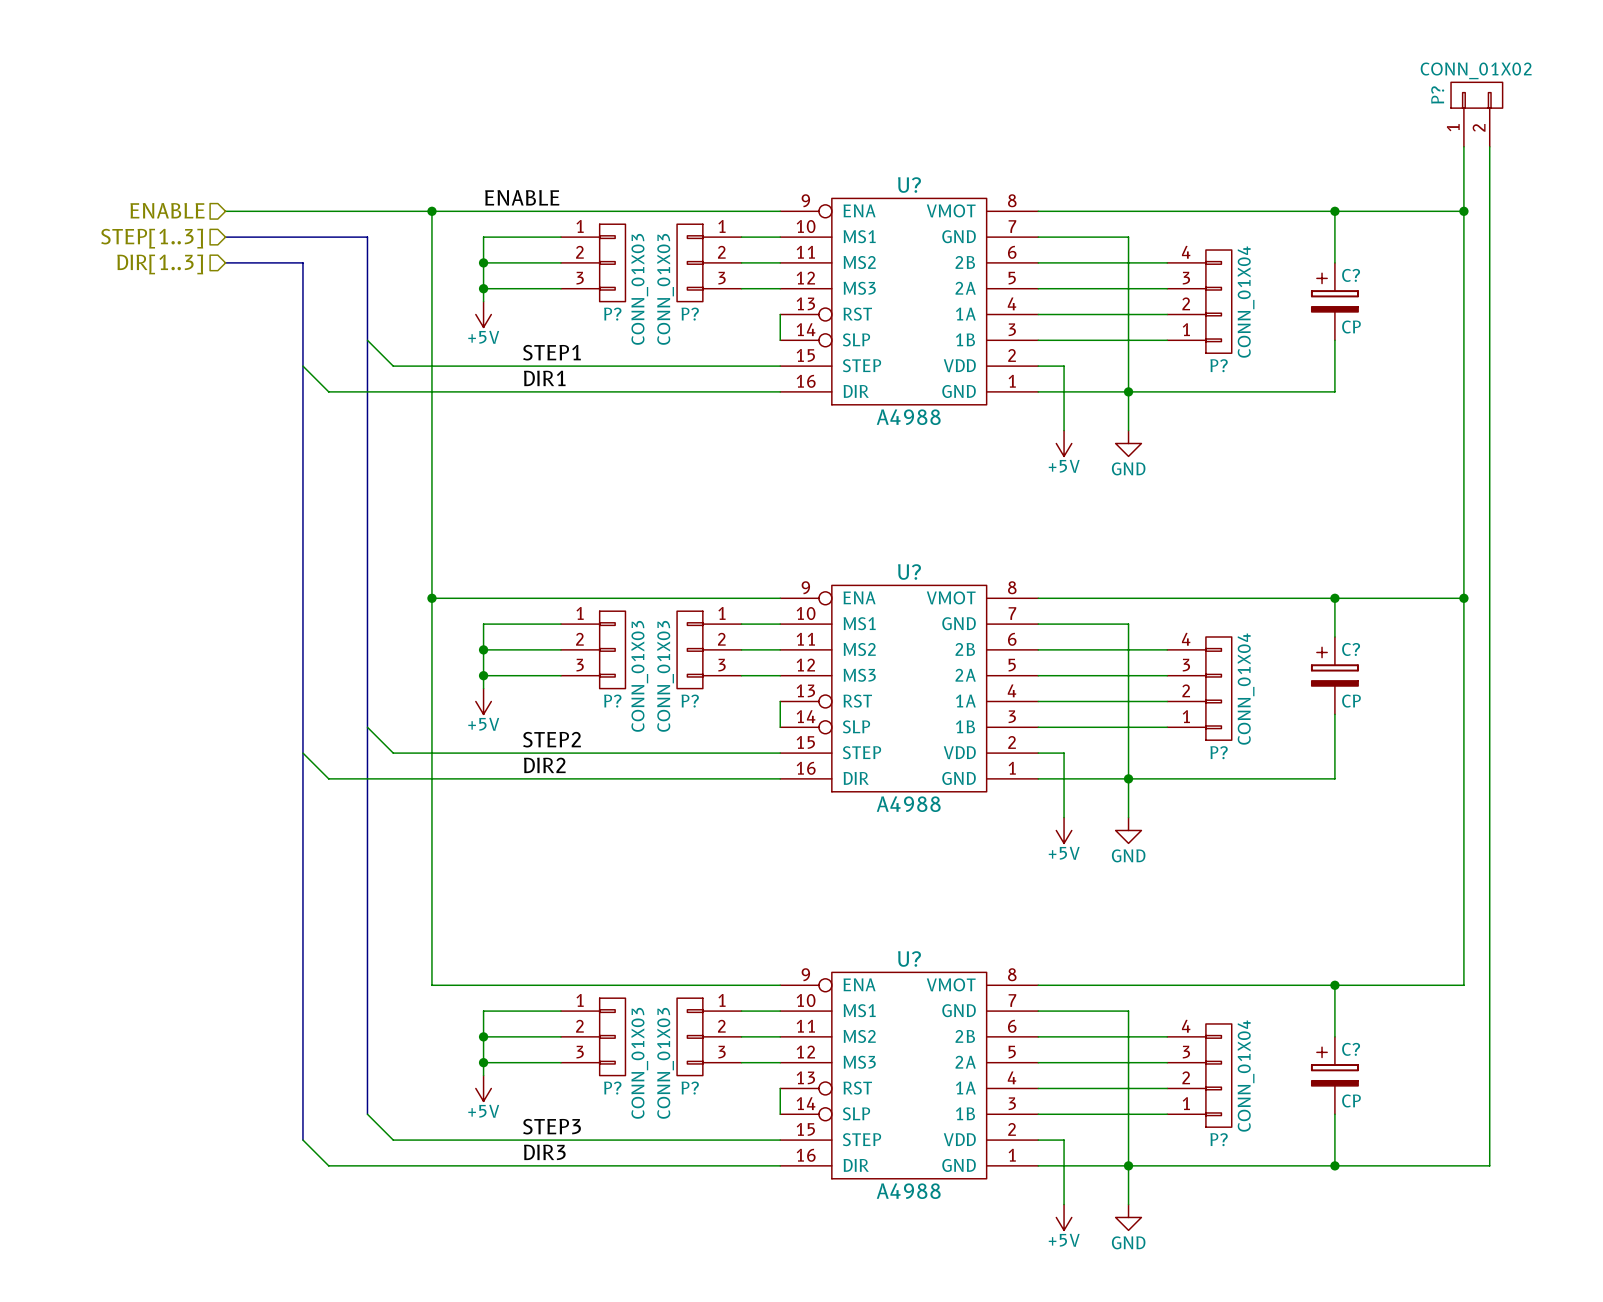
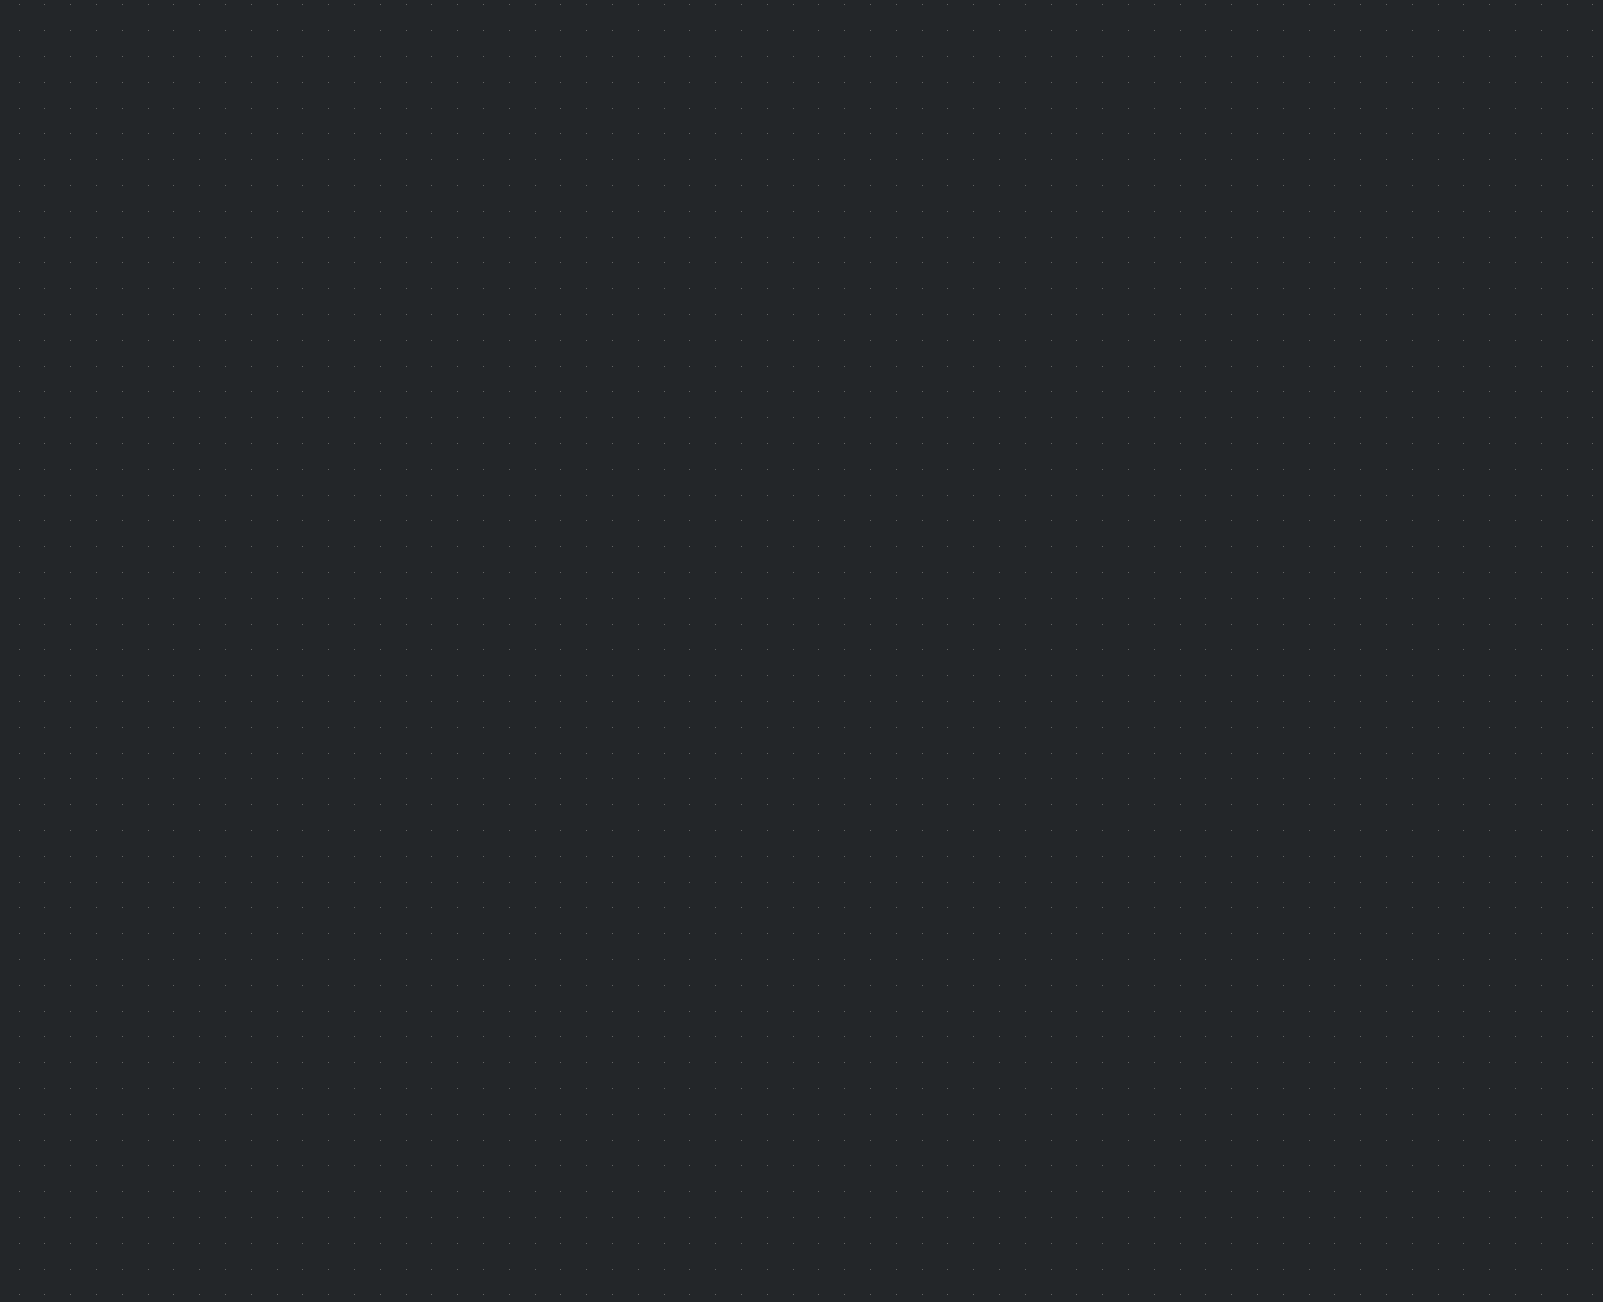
P?: CONN_01X02 (1476, 114) -> none
wire: (1463, 146) (1463, 985) (1038, 985) -> none
wire: (1489, 146) (1489, 1165) (1038, 1165) -> none
label: ENABLE (522, 197) -> none
hierarchical label: ENABLE (167, 210) -> none
wire: (225, 211) (780, 211) -> none
wire: (431, 211) (431, 985) (780, 985) -> none
junction: (431, 211) -> none
wire: (1038, 211) (1463, 211) -> none
wire: (1334, 211) (1334, 262) -> none
junction: (1334, 211) -> none
junction: (1463, 211) -> none
bus: (225, 237) (367, 237) (367, 1114) -> none
wire: (560, 237) (483, 237) (483, 301) -> none
wire: (741, 237) (780, 237) -> none
wire: (1038, 237) (1128, 237) (1128, 430) -> none
hierarchical label: STEP[1..3] (152, 238) -> none
bus: (225, 262) (302, 262) (302, 1140) -> none
wire: (483, 262) (560, 262) -> none
junction: (483, 262) -> none
P?: CONN_01X03 (593, 262) -> none
P?: CONN_01X03 (709, 262) -> none
wire: (741, 262) (780, 262) -> none
wire: (1038, 262) (1167, 262) -> none
hierarchical label: DIR[1..3] (160, 264) -> none
wire: (483, 288) (560, 288) -> none
junction: (483, 288) -> none
wire: (741, 288) (780, 288) -> none
wire: (1038, 288) (1167, 288) -> none
P?: CONN_01X04 (1199, 301) -> none
C?: CP (1334, 301) -> none
power symbol: +5V (483, 314) -> none
wire: (780, 314) (780, 340) -> none
wire: (1038, 314) (1167, 314) -> none
wire: (367, 340) (393, 366) (780, 366) -> none
U?: A4988 (915, 340) -> none
wire: (1038, 340) (1167, 340) -> none
wire: (1334, 340) (1334, 391) (1038, 391) -> none
label: STEP1 (551, 352) -> none
wire: (302, 366) (328, 391) (780, 391) -> none
wire: (1038, 366) (1064, 366) (1064, 430) -> none
label: DIR1 (544, 378) -> none
junction: (1128, 391) -> none
power symbol: +5V (1064, 443) -> none
power symbol: GND (1128, 443) -> none
wire: (431, 598) (780, 598) -> none
junction: (431, 598) -> none
wire: (1038, 598) (1463, 598) -> none
wire: (1334, 598) (1334, 636) -> none
junction: (1334, 598) -> none
junction: (1463, 598) -> none
wire: (560, 624) (483, 624) (483, 688) -> none
wire: (741, 624) (780, 624) -> none
wire: (1038, 624) (1128, 624) (1128, 817) -> none
wire: (483, 649) (560, 649) -> none
junction: (483, 649) -> none
P?: CONN_01X03 (593, 649) -> none
P?: CONN_01X03 (709, 649) -> none
wire: (741, 649) (780, 649) -> none
wire: (1038, 649) (1167, 649) -> none
wire: (483, 675) (560, 675) -> none
junction: (483, 675) -> none
wire: (741, 675) (780, 675) -> none
wire: (1038, 675) (1167, 675) -> none
C?: CP (1334, 675) -> none
P?: CONN_01X04 (1199, 688) -> none
power symbol: +5V (483, 701) -> none
wire: (780, 701) (780, 727) -> none
wire: (1038, 701) (1167, 701) -> none
wire: (1334, 714) (1334, 778) (1038, 778) -> none
wire: (367, 727) (393, 753) (780, 753) -> none
U?: A4988 (915, 727) -> none
wire: (1038, 727) (1167, 727) -> none
label: STEP2 (551, 739) -> none
wire: (302, 753) (328, 778) (780, 778) -> none
wire: (1038, 753) (1064, 753) (1064, 817) -> none
label: DIR2 (544, 765) -> none
junction: (1128, 778) -> none
power symbol: +5V (1064, 830) -> none
power symbol: GND (1128, 830) -> none
wire: (1334, 985) (1334, 1036) -> none
junction: (1334, 985) -> none
wire: (560, 1011) (483, 1011) (483, 1075) -> none
wire: (741, 1011) (780, 1011) -> none
wire: (1038, 1011) (1128, 1011) (1128, 1204) -> none
wire: (483, 1036) (560, 1036) -> none
junction: (483, 1036) -> none
P?: CONN_01X03 (593, 1036) -> none
P?: CONN_01X03 (709, 1036) -> none
wire: (741, 1036) (780, 1036) -> none
wire: (1038, 1036) (1167, 1036) -> none
wire: (483, 1062) (560, 1062) -> none
junction: (483, 1062) -> none
wire: (741, 1062) (780, 1062) -> none
wire: (1038, 1062) (1167, 1062) -> none
P?: CONN_01X04 (1199, 1075) -> none
C?: CP (1334, 1075) -> none
power symbol: +5V (483, 1088) -> none
wire: (780, 1088) (780, 1114) -> none
wire: (1038, 1088) (1167, 1088) -> none
wire: (367, 1114) (393, 1140) (780, 1140) -> none
U?: A4988 (915, 1114) -> none
wire: (1038, 1114) (1167, 1114) -> none
wire: (1334, 1114) (1334, 1165) -> none
label: STEP3 (552, 1126) -> none
wire: (302, 1140) (328, 1165) (780, 1165) -> none
wire: (1038, 1140) (1064, 1140) (1064, 1204) -> none
label: DIR3 (544, 1152) -> none
junction: (1128, 1165) -> none
junction: (1334, 1165) -> none
power symbol: +5V (1064, 1217) -> none
power symbol: GND (1128, 1217) -> none

